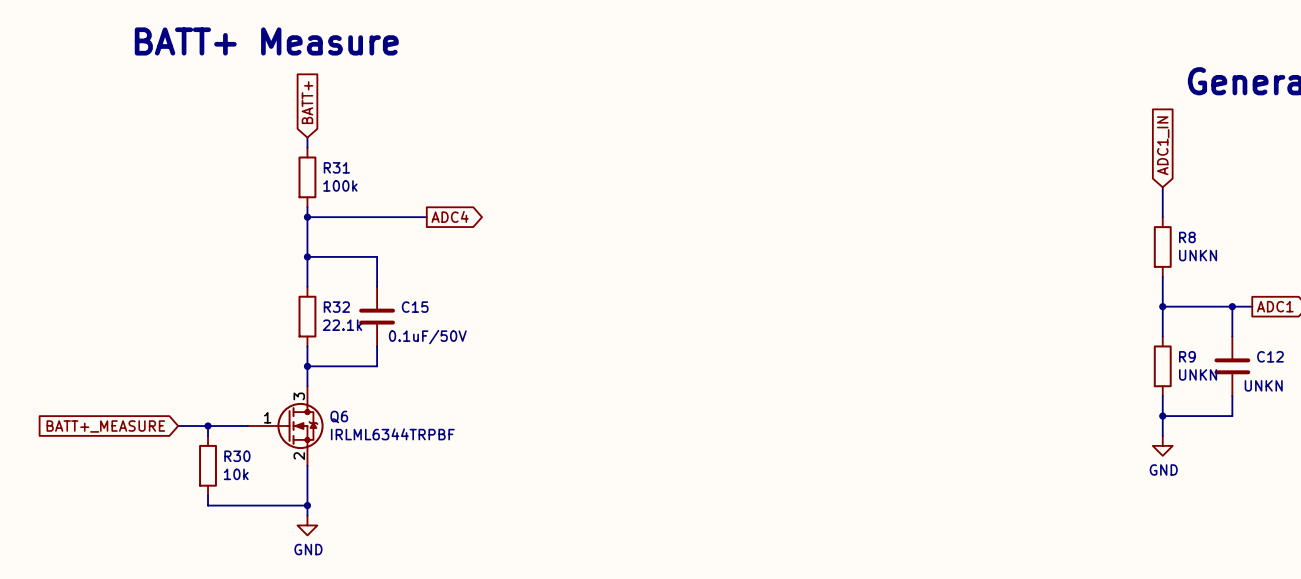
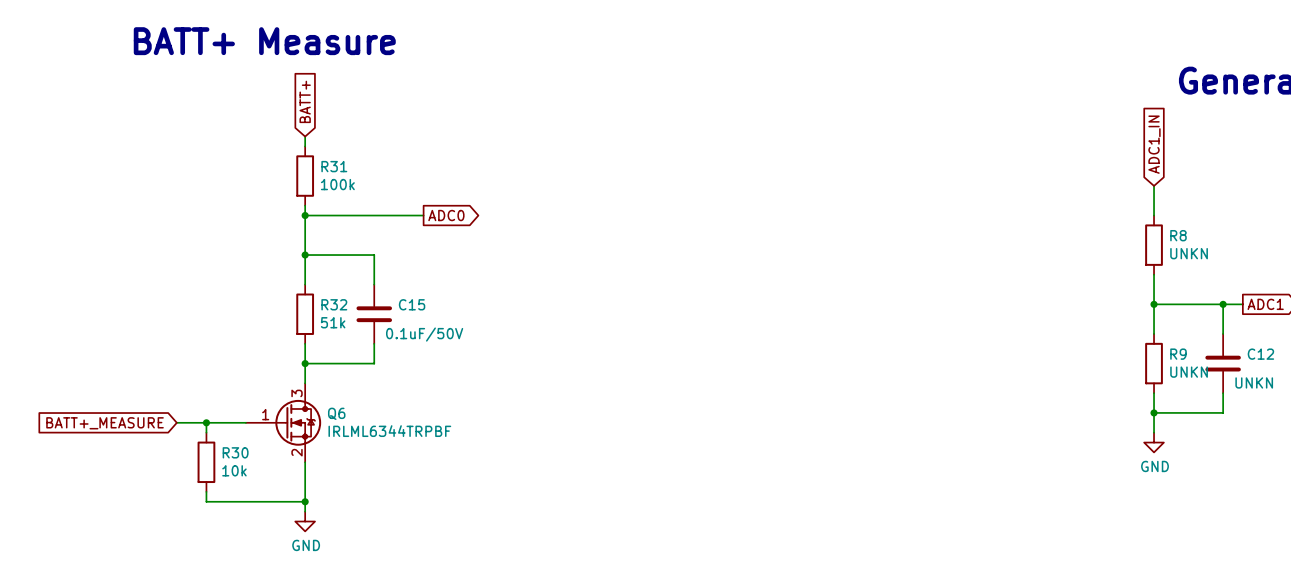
global label: ADC4 (450, 216) -> ADC0 (446, 215)
R32 value: 22.1k (342, 325) -> 51k (333, 322)

